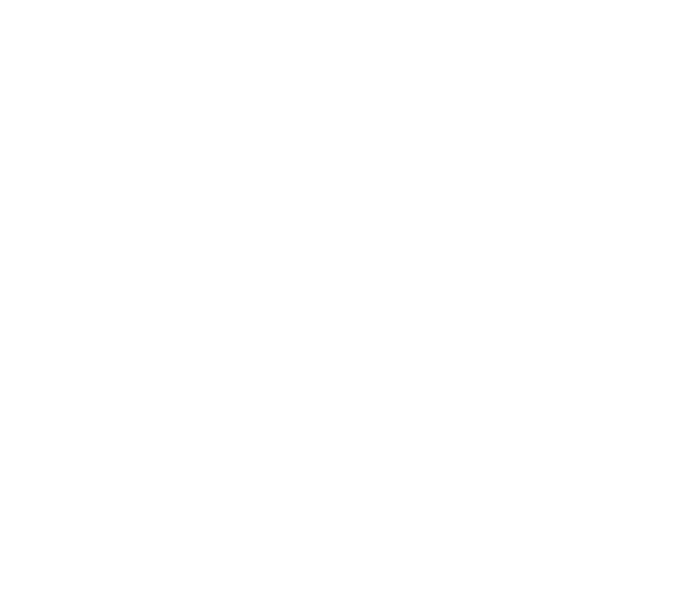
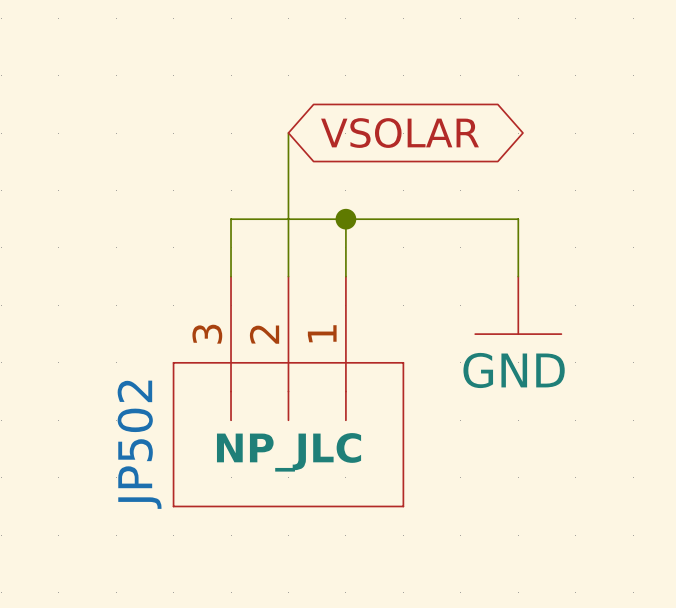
wire: none -> (288, 133) (288, 276)
global label: none -> VSOLAR (400, 133)
wire: none -> (345, 219) (345, 276)
junction: none -> (345, 219)
wire: none -> (231, 276) (231, 219) (518, 219) (518, 276)
power symbol: none -> GND (518, 305)
JP502: none -> (288, 391)

